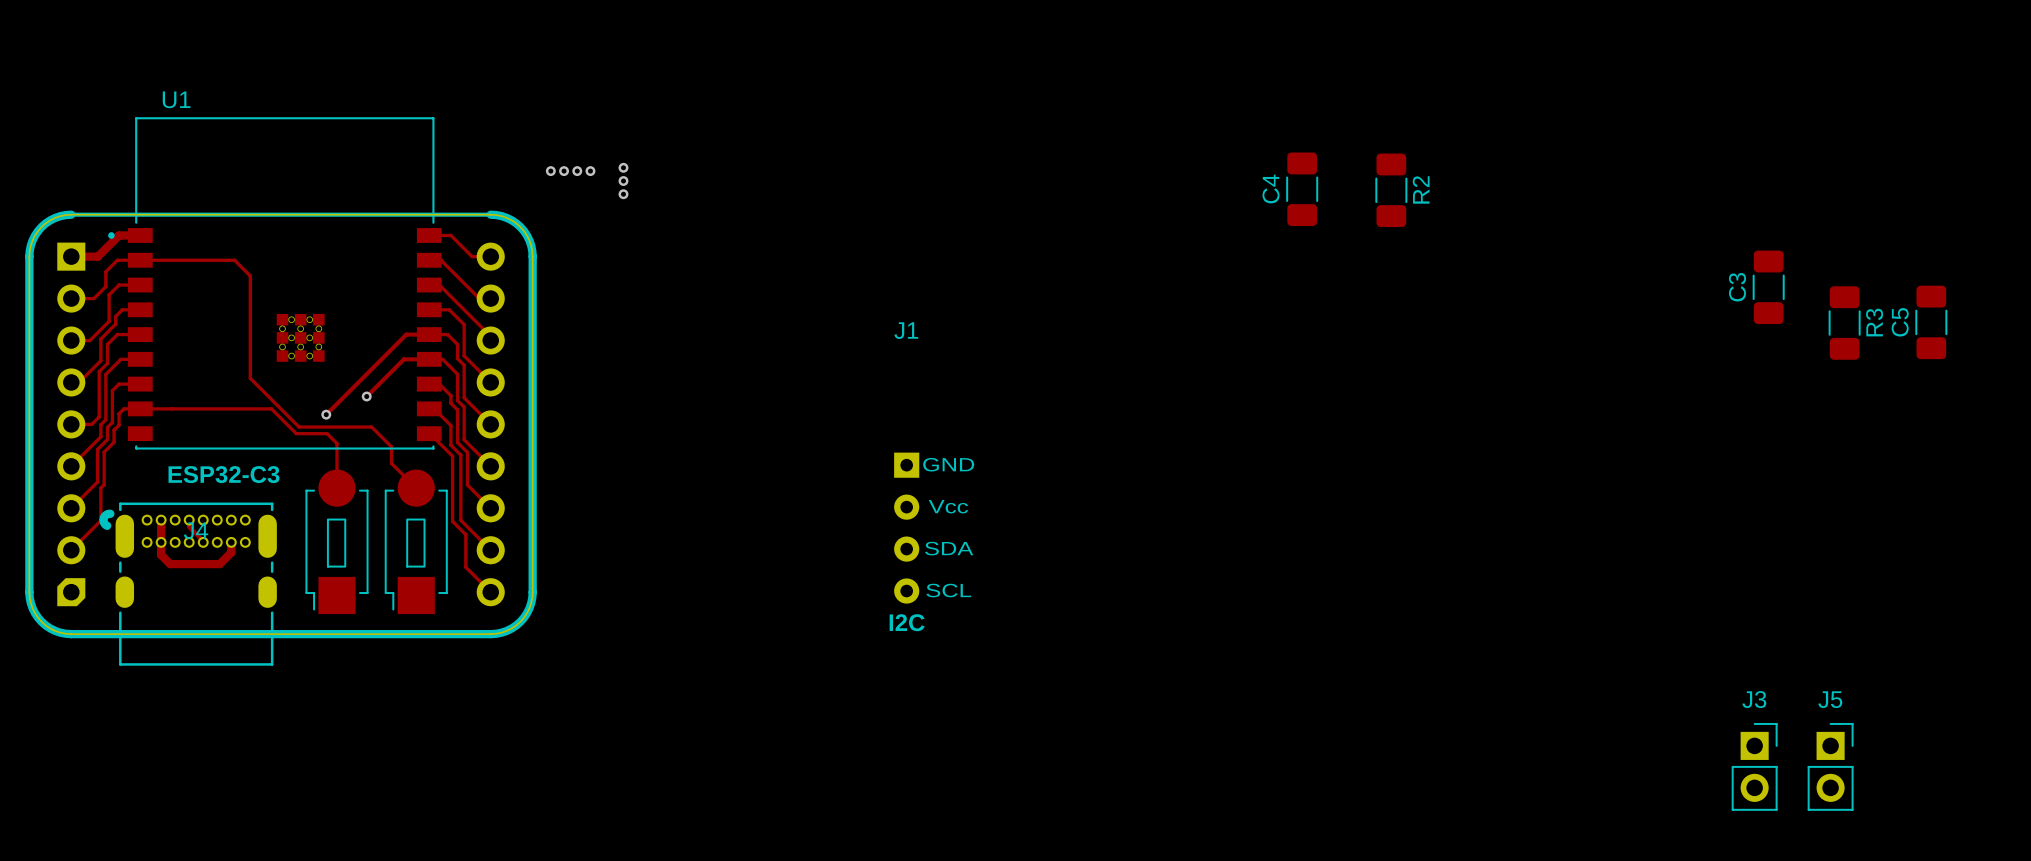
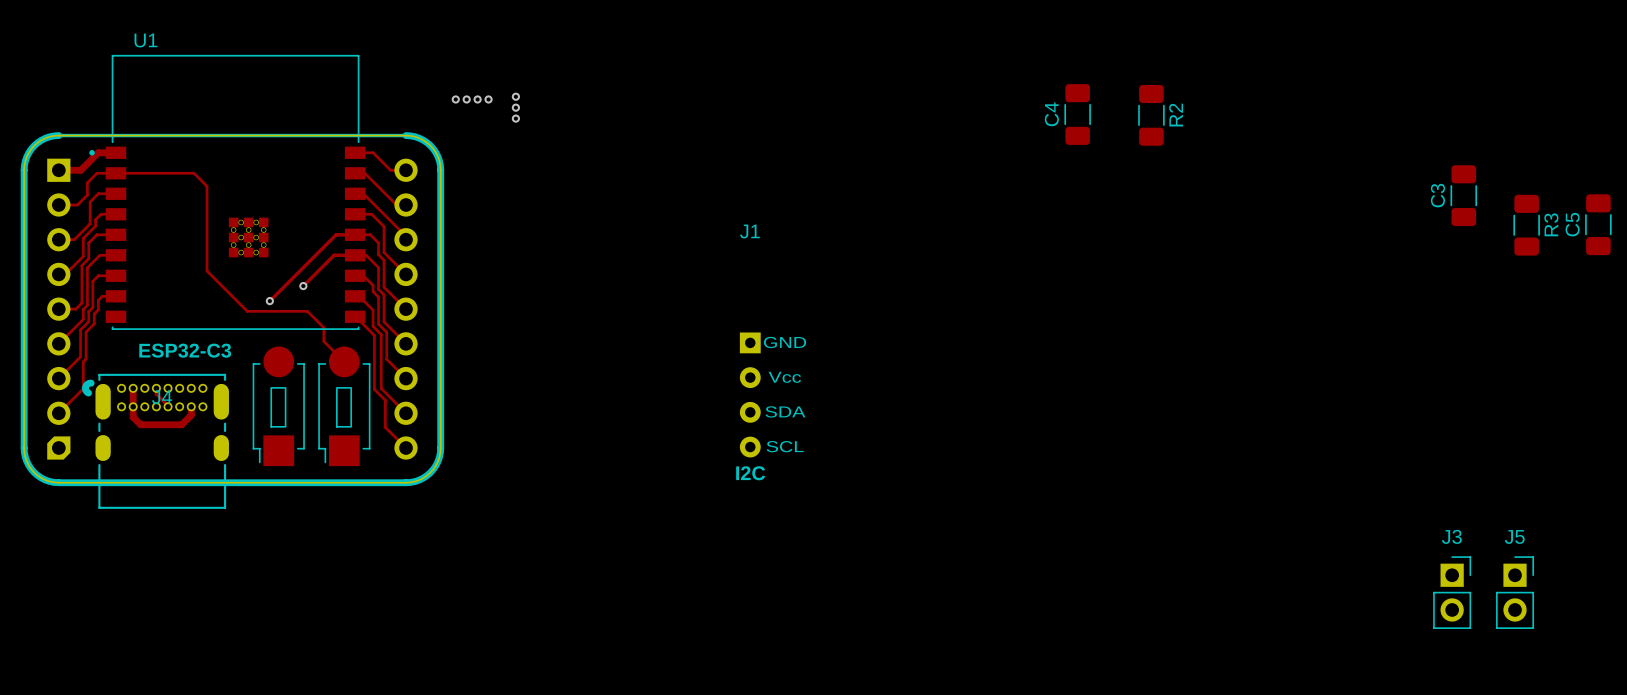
track: (140, 408) (271, 408) (296, 433) (327, 433) (337, 443) (337, 488) -> none

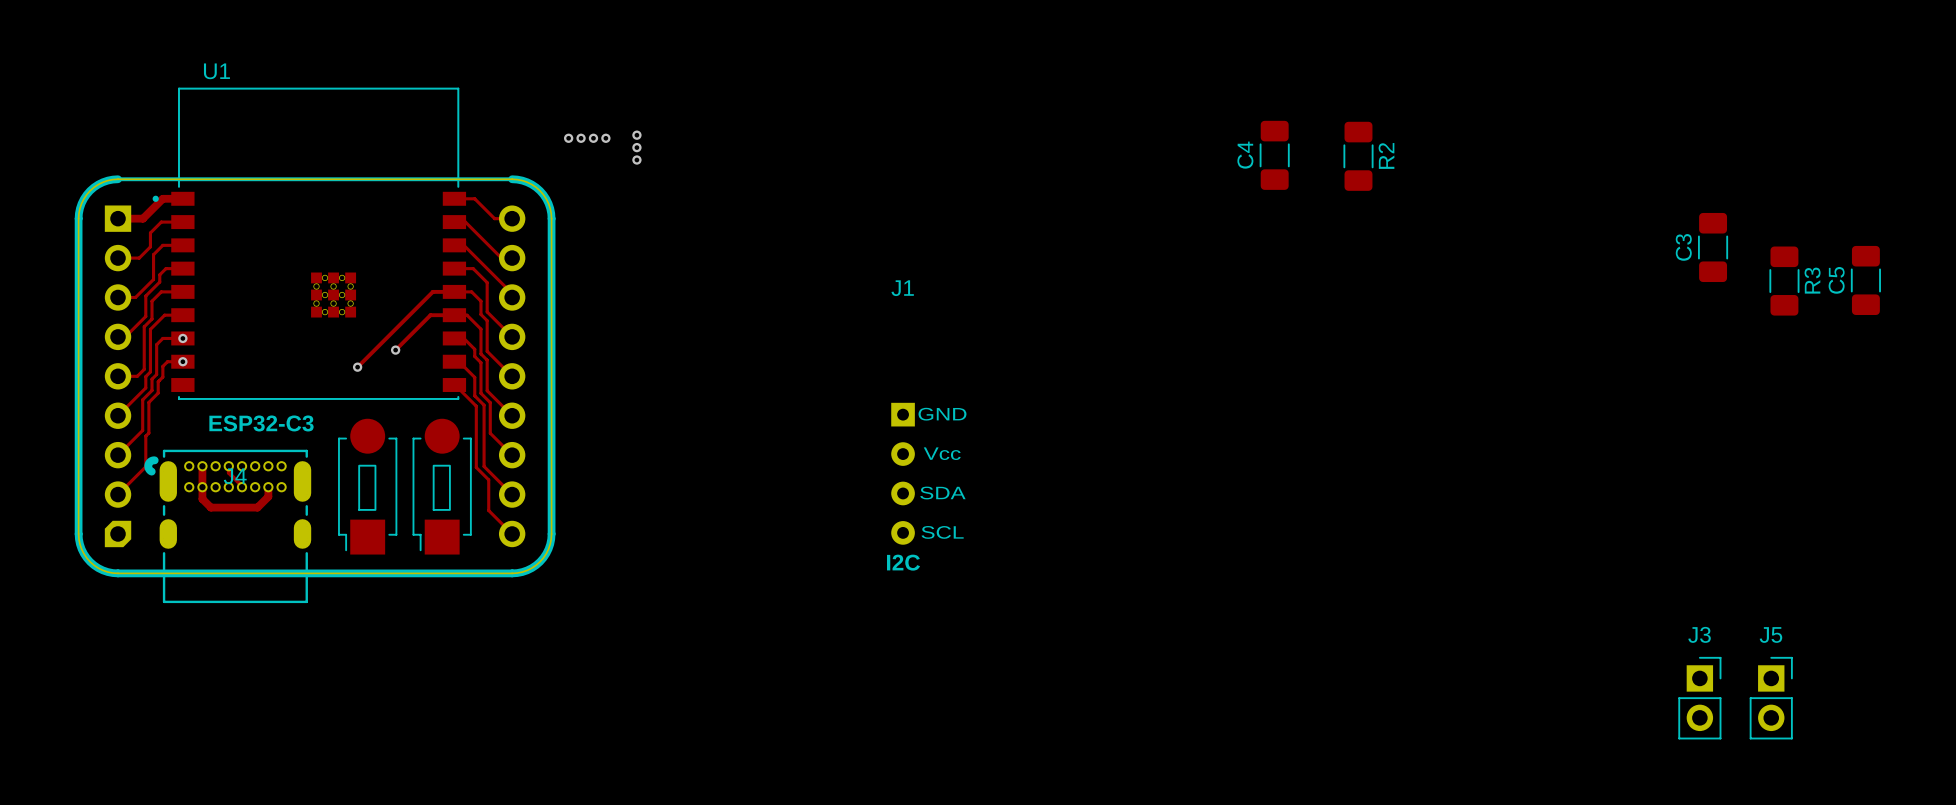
track: (115, 173) (194, 173) (206, 186) (206, 271) (247, 311) (307, 311) (323, 327) (323, 341) (344, 361) -> none
via: none -> (182, 338)
via: none -> (182, 361)

